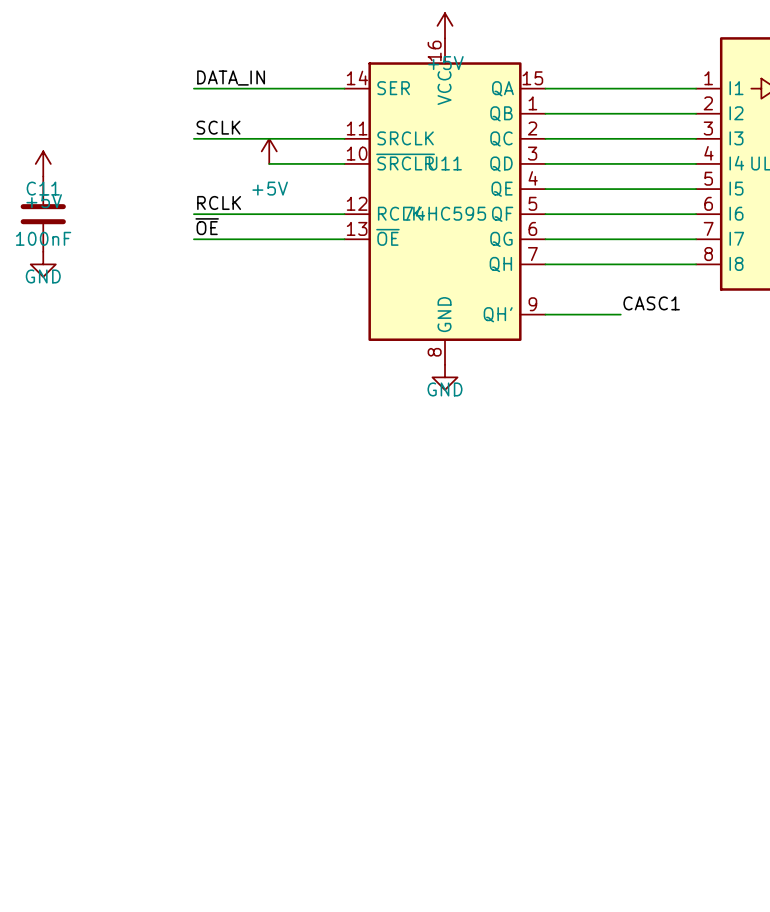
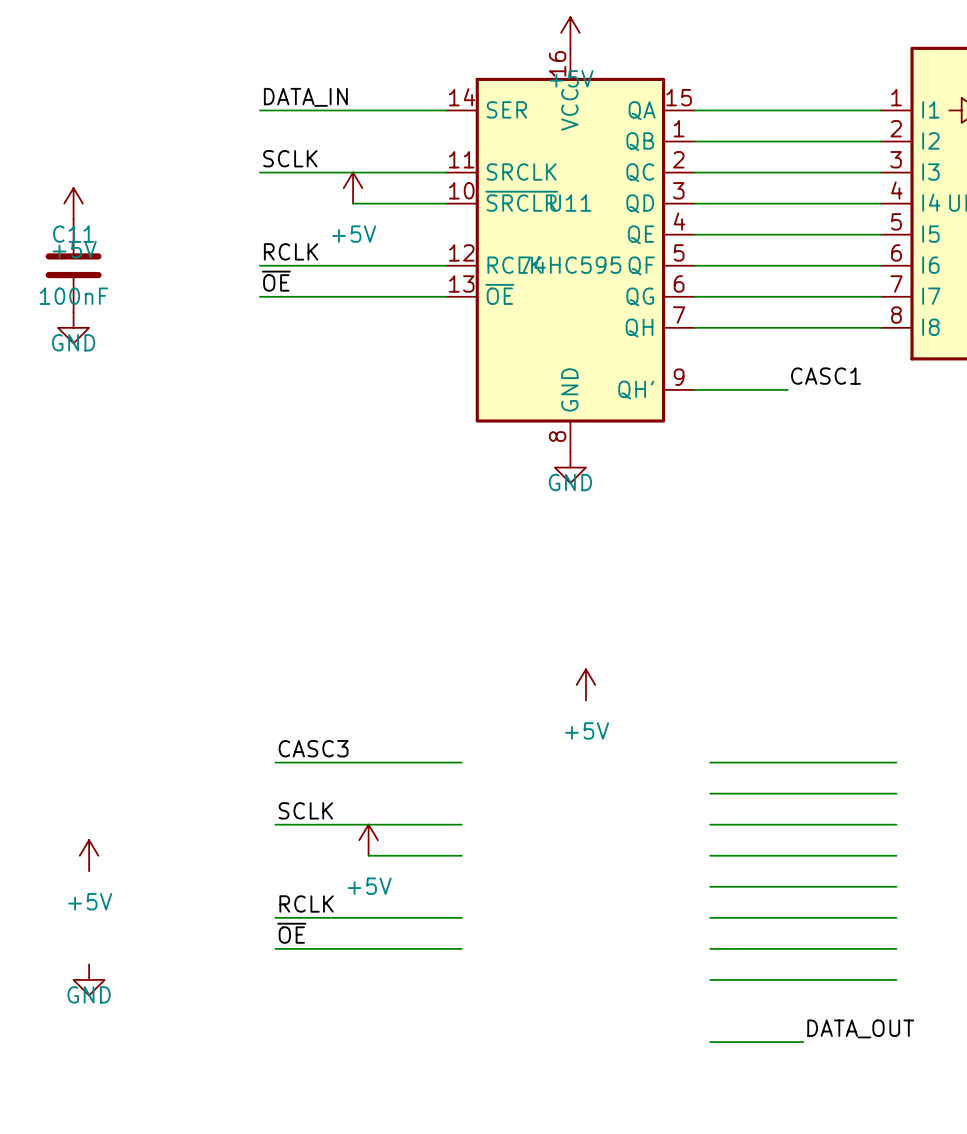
power symbol: none -> +5V (585, 684)
label: none -> CASC3 (313, 748)
wire: none -> (275, 762) (461, 762)
wire: none -> (710, 762) (896, 762)
wire: none -> (710, 793) (896, 793)
label: none -> SCLK (305, 810)
wire: none -> (275, 824) (461, 824)
wire: none -> (710, 824) (896, 824)
power symbol: none -> +5V (368, 840)
power symbol: none -> +5V (89, 855)
wire: none -> (368, 855) (461, 855)
wire: none -> (710, 855) (896, 855)
wire: none -> (710, 886) (896, 886)
label: none -> RCLK (306, 903)
wire: none -> (275, 917) (461, 917)
wire: none -> (710, 917) (896, 917)
label: none -> ~{OE} (291, 933)
wire: none -> (275, 948) (461, 948)
wire: none -> (710, 948) (896, 948)
power symbol: none -> GND (89, 979)
wire: none -> (710, 979) (896, 979)
label: none -> DATA_OUT (860, 1028)
wire: none -> (710, 1042) (803, 1042)

